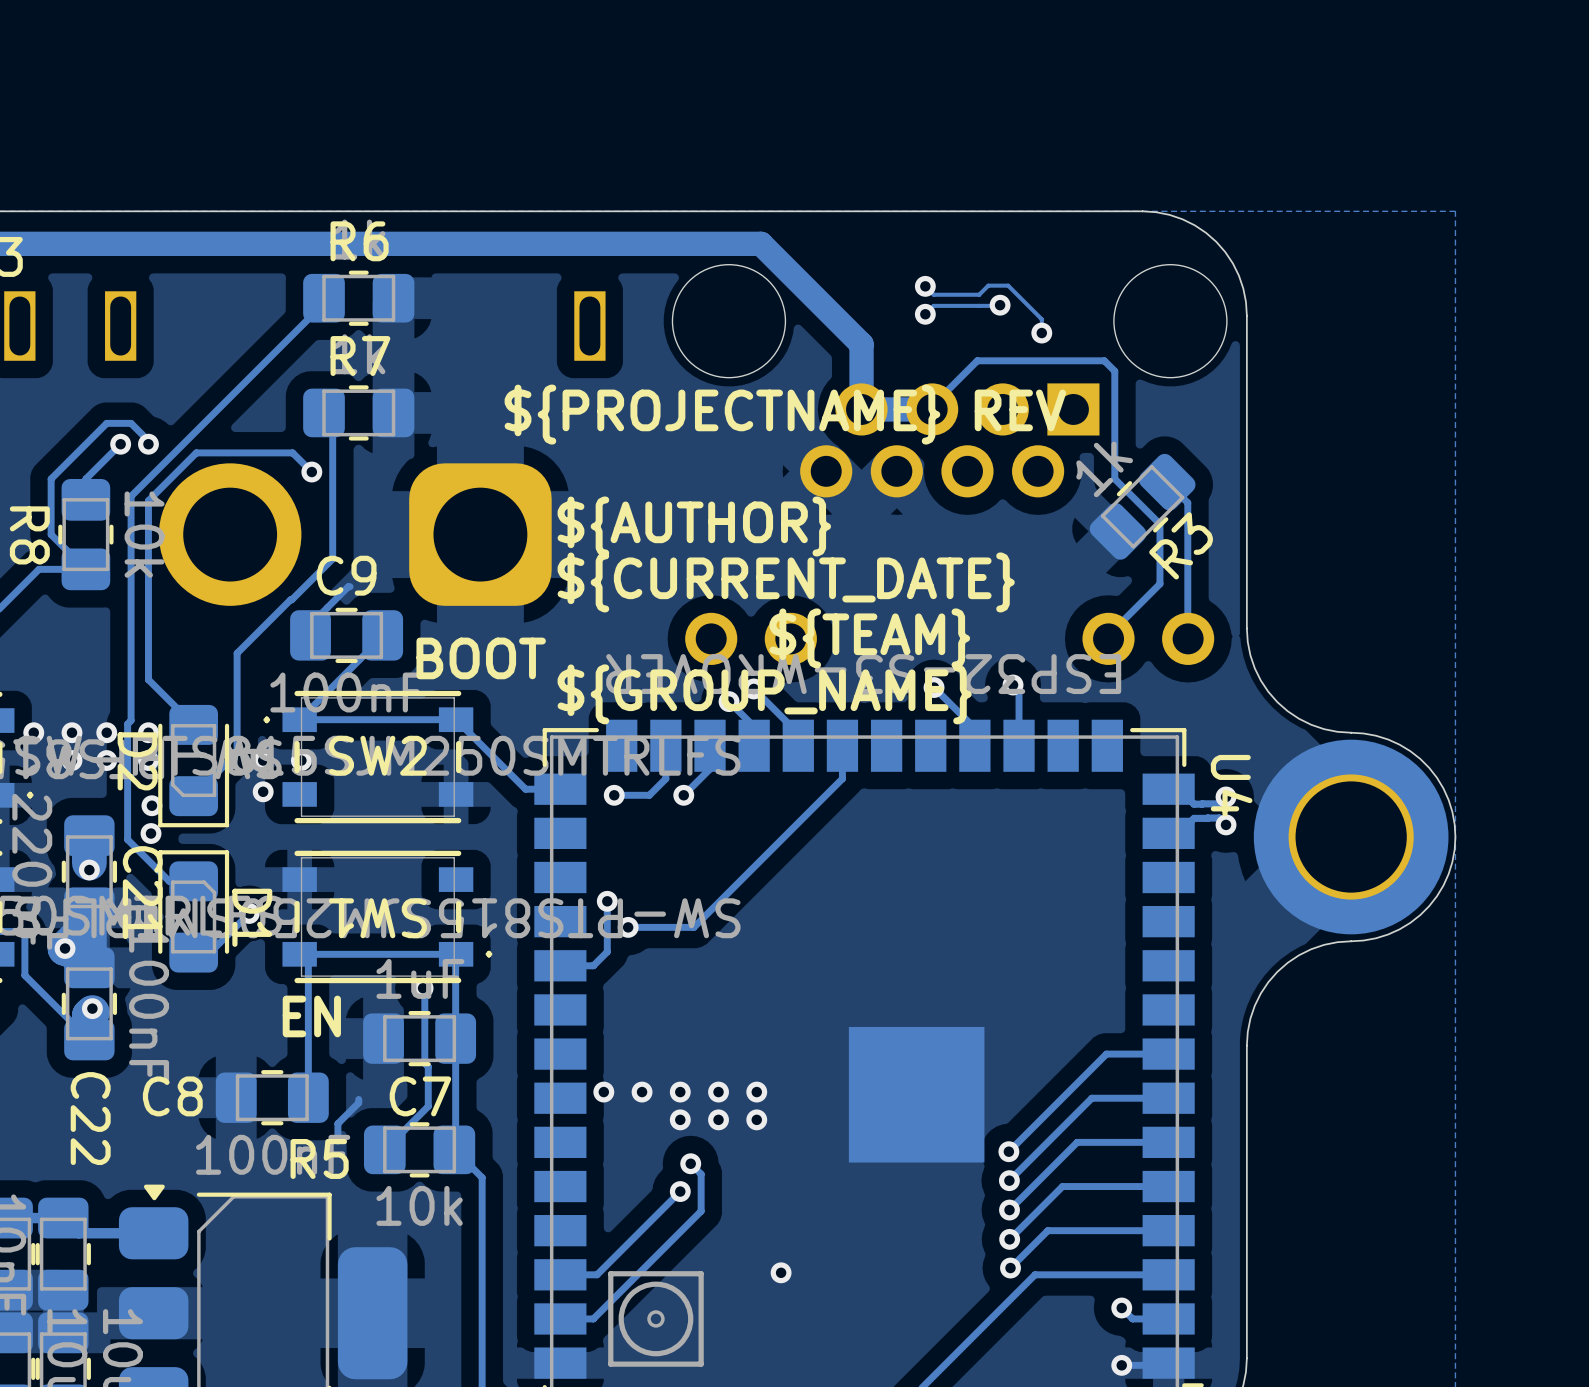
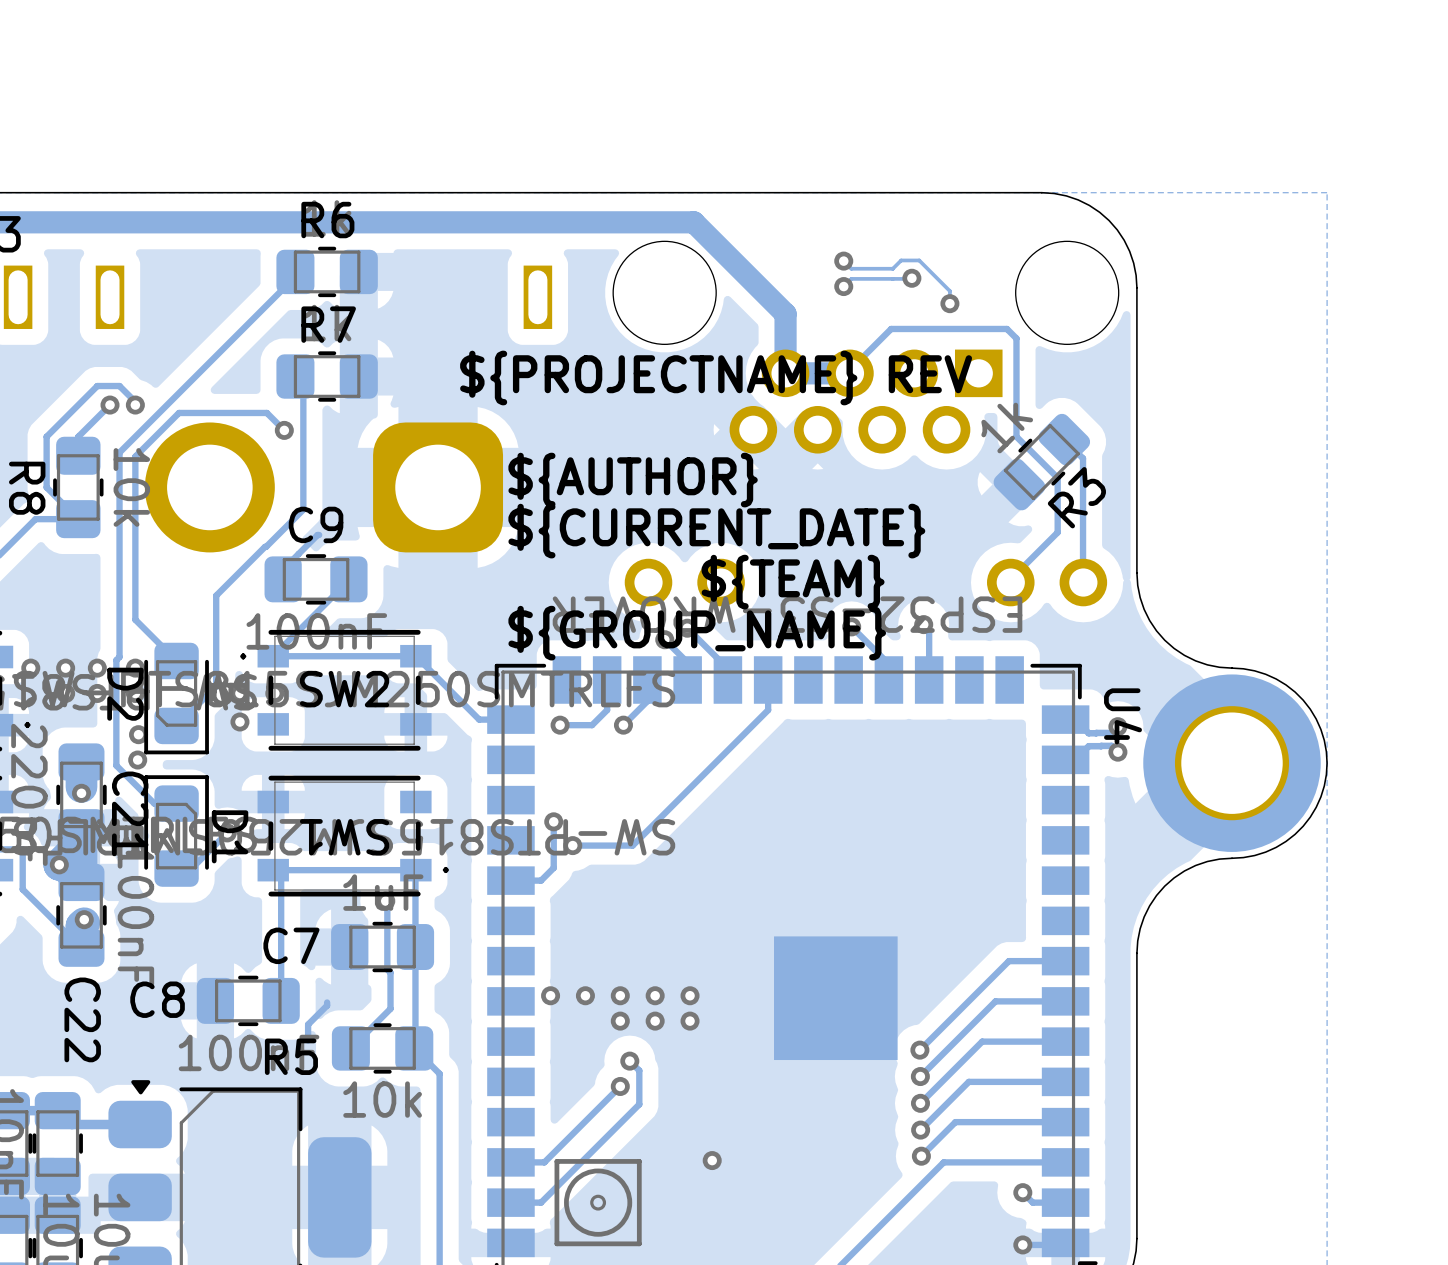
text: BOOT (481, 658) -> none
text: EN (311, 1016) -> none
C7 name position: C7 (420, 1096) -> C7 (291, 945)

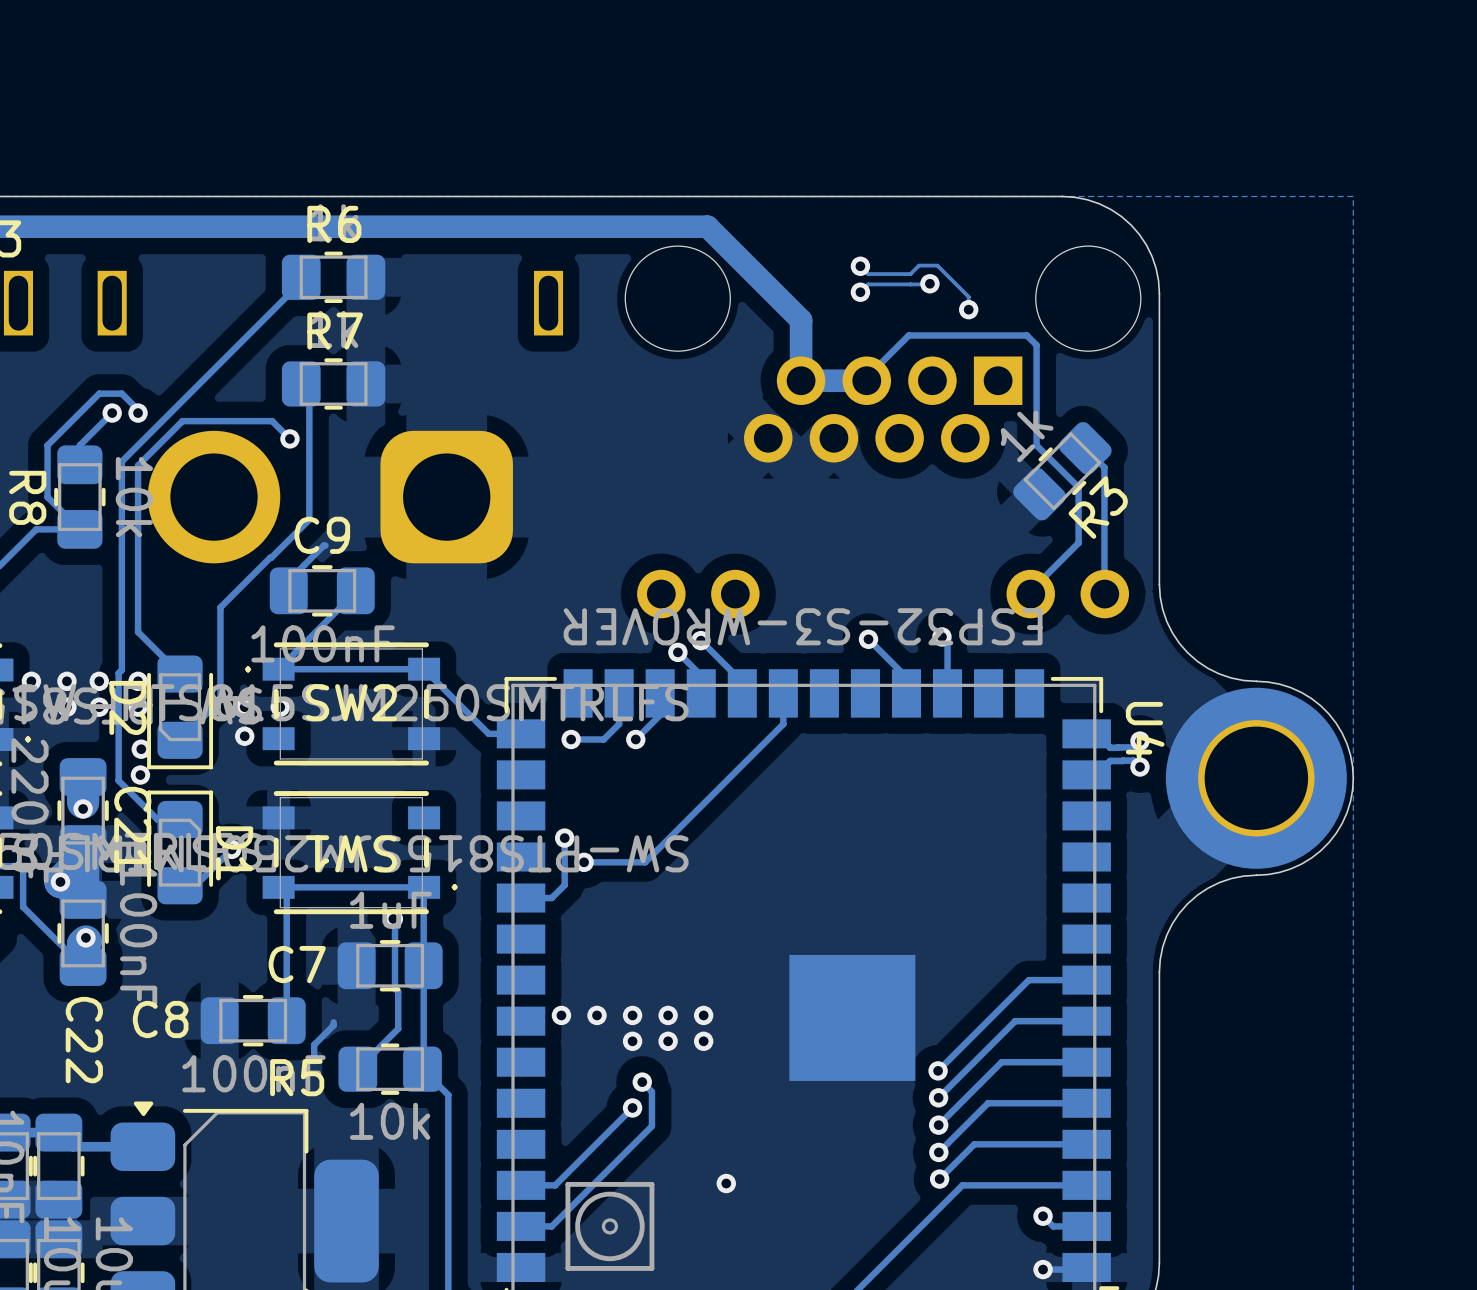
text: ${PROJECTNAME} REV (716, 378) -> none
text: ${AUTHOR} (633, 480) -> none
text: ${CURRENT_DATE} (716, 531) -> none
text: ${TEAM} (793, 582) -> none
text: ${GROUP_NAME} (697, 633) -> none

